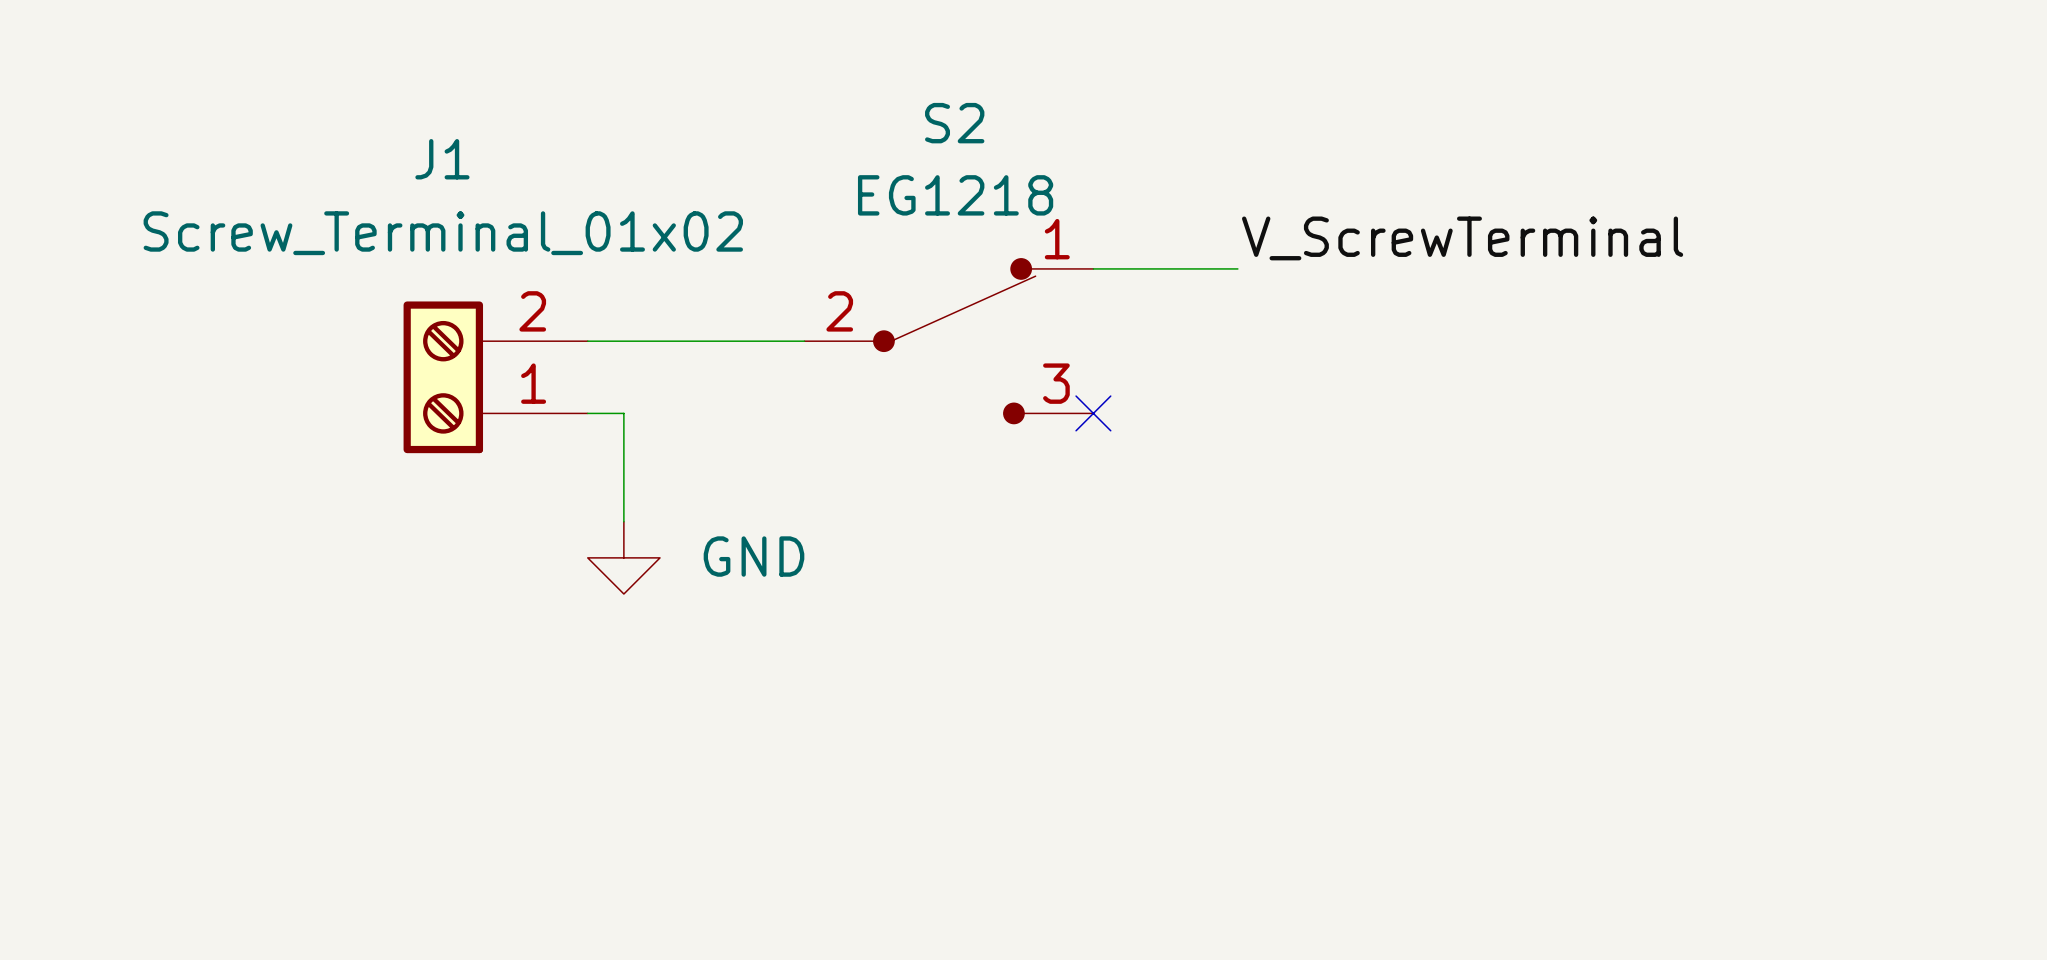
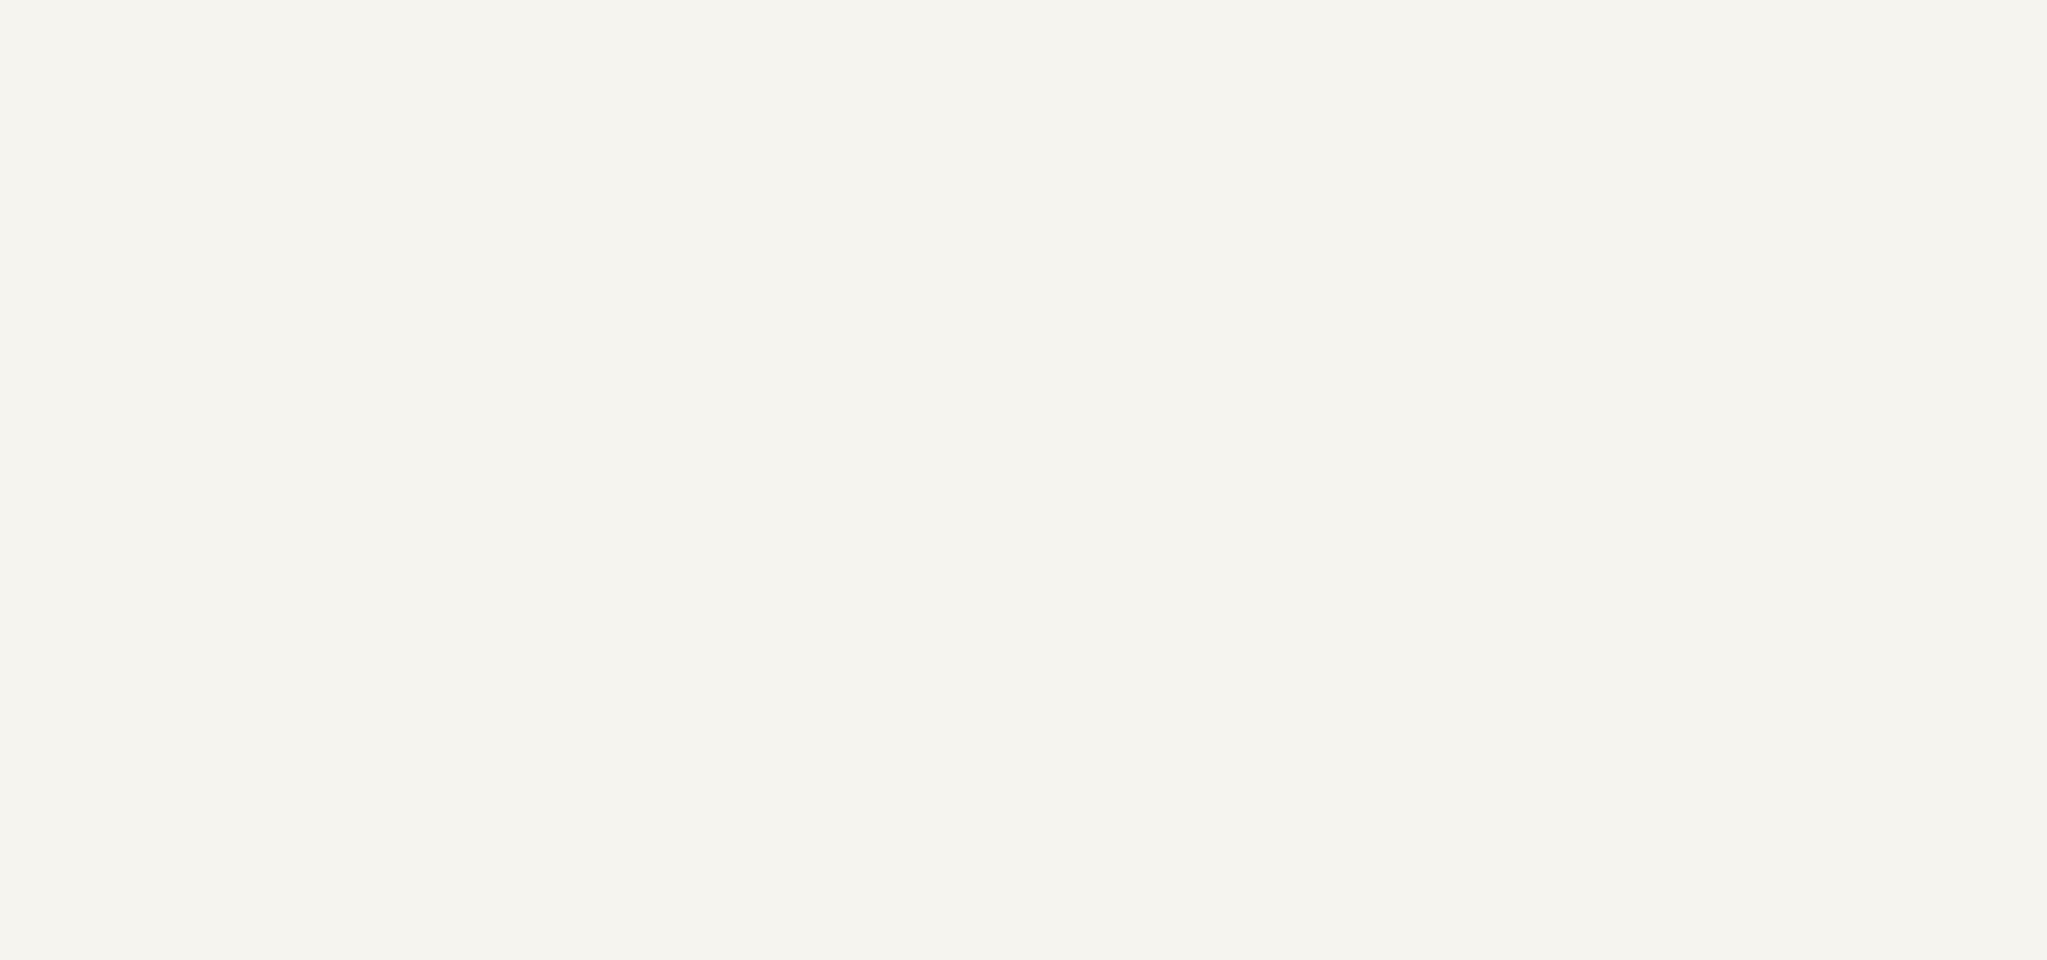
label: V_ScrewTerminal (1462, 238) -> none
wire: (1093, 268) (1237, 268) -> none
wire: (587, 341) (804, 341) -> none
S2: EG1218 (948, 341) -> none
J1: Screw_Terminal_01x02 (495, 377) -> none
wire: (587, 413) (623, 413) (623, 521) -> none
no-connect mark: (1093, 413) -> none
power symbol: GND (623, 557) -> none

